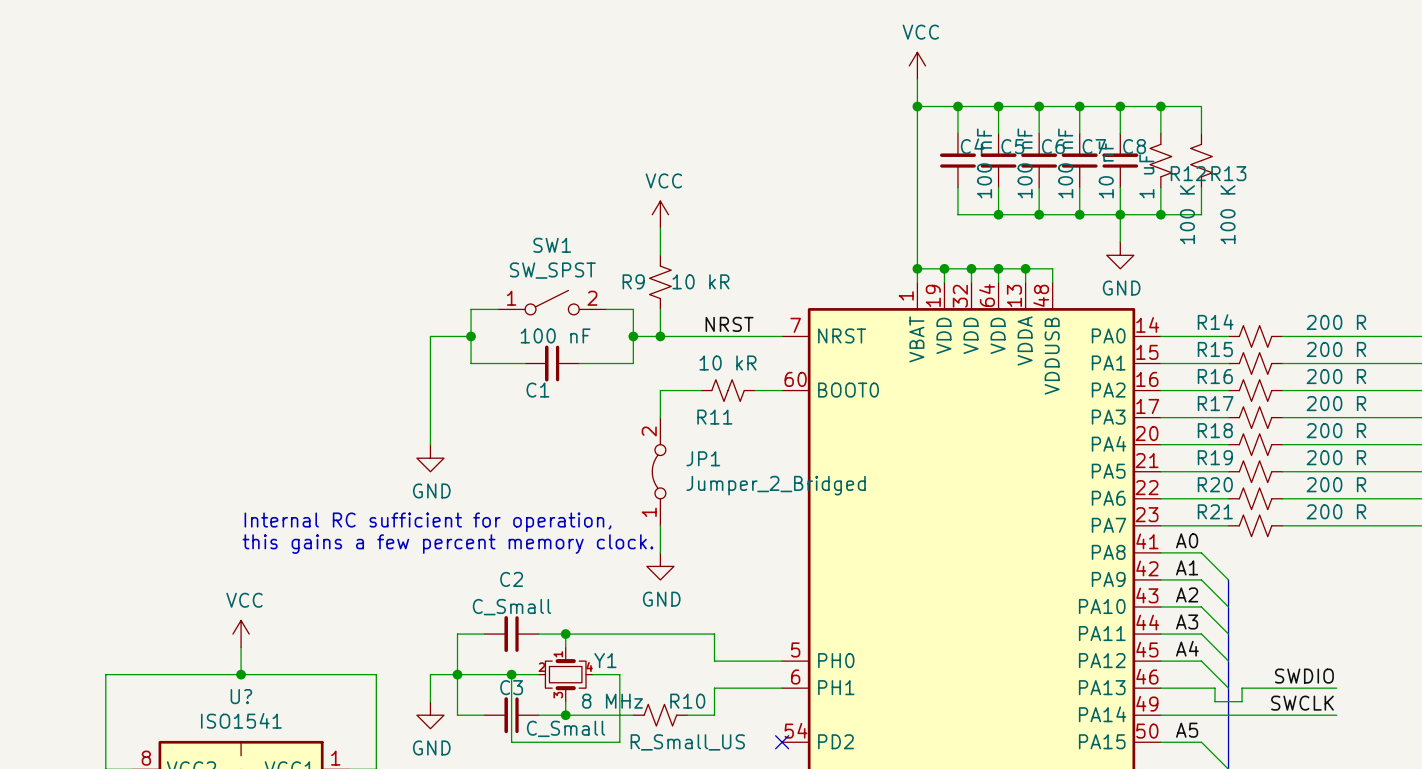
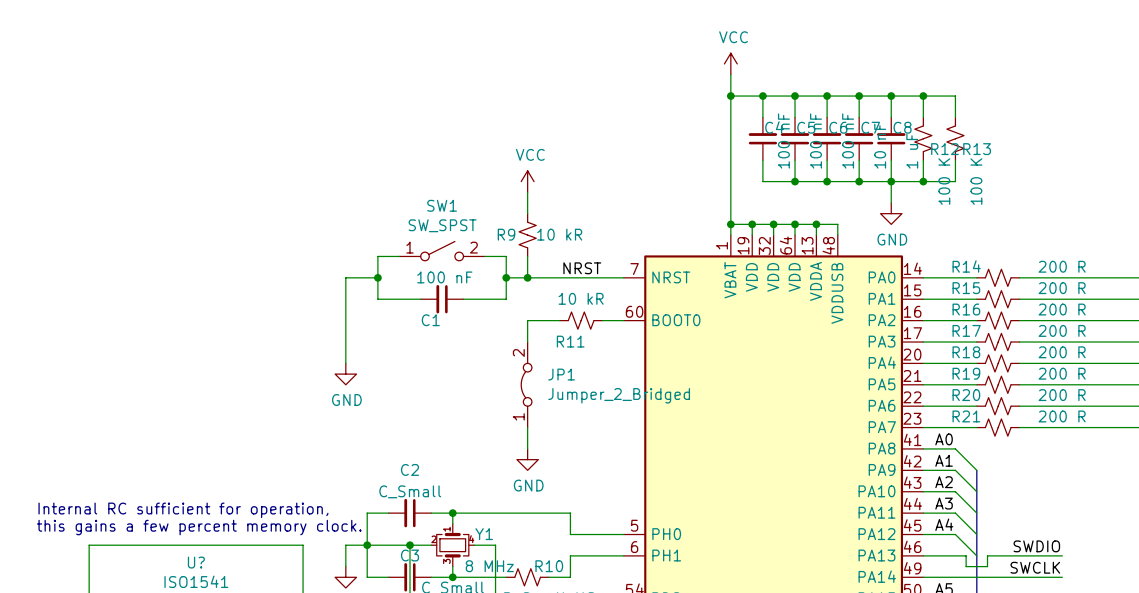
text position: Internal RC sufficient for operation, (427, 522) -> Internal RC sufficient for operation, (183, 510)
text position: this gains a few percent memory clock. (447, 544) -> this gains a few percent memory clock. (199, 527)
power symbol: VCC (241, 634) -> none
wire: (241, 647) (241, 674) -> none
junction: (241, 674) -> none

